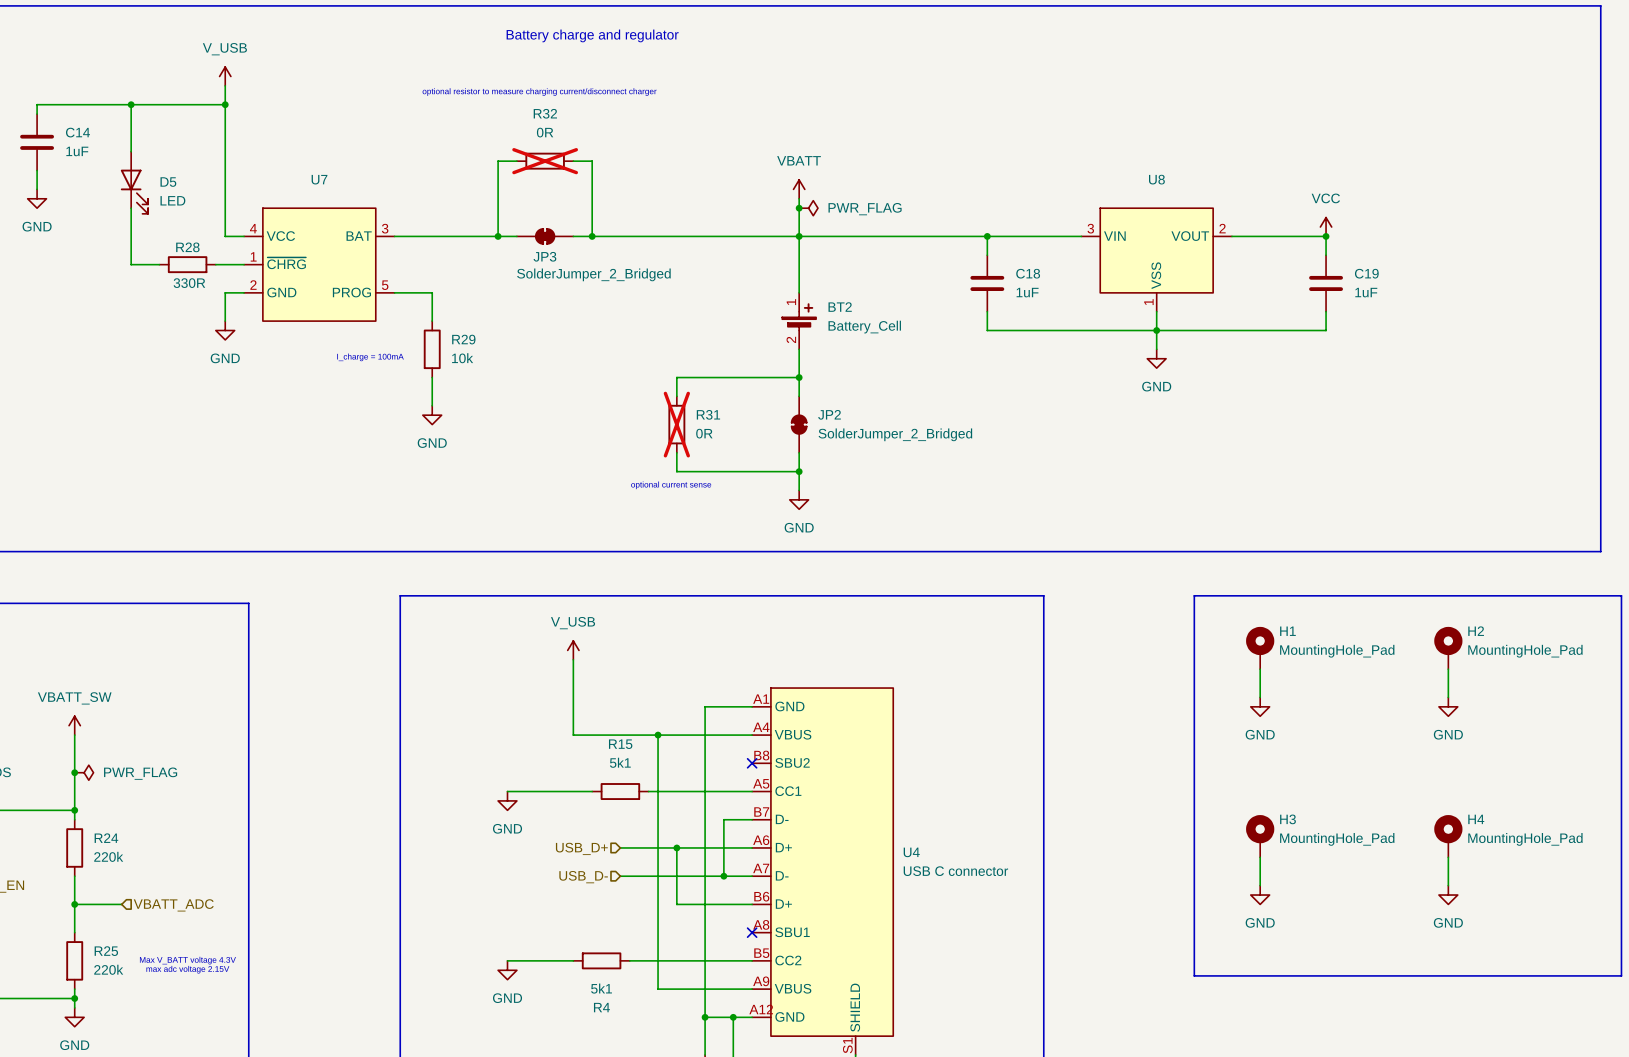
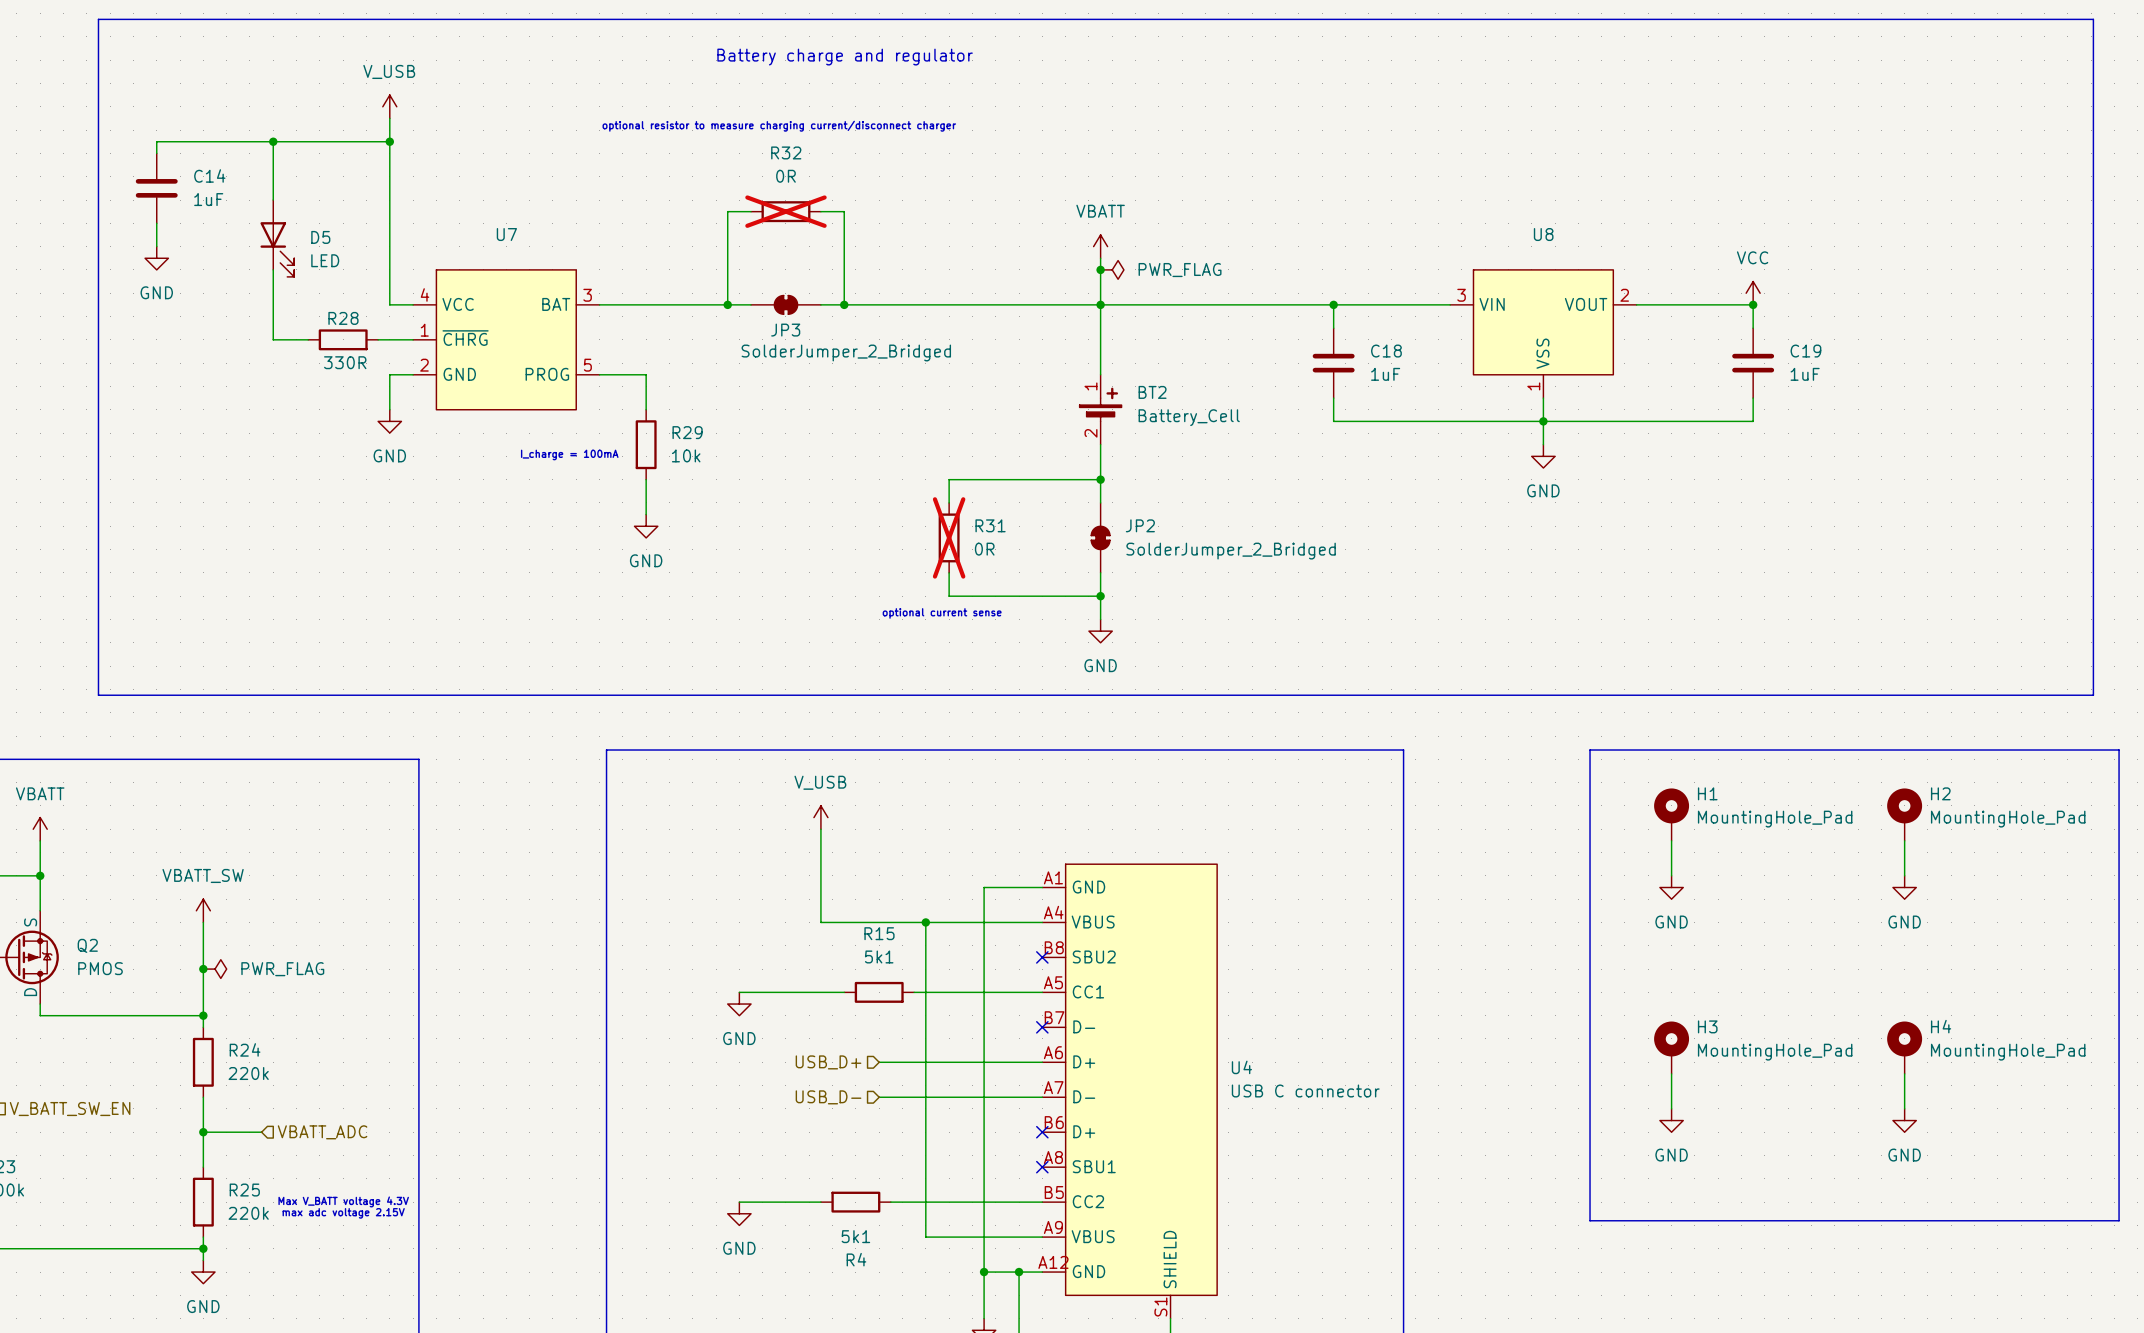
wire: (752, 819) (723, 819) (723, 876) -> none
no-connect mark: none -> (1042, 1027)
wire: (676, 847) (676, 904) (752, 904) -> none
junction: (676, 847) -> none
junction: (723, 876) -> none
no-connect mark: none -> (1042, 1132)

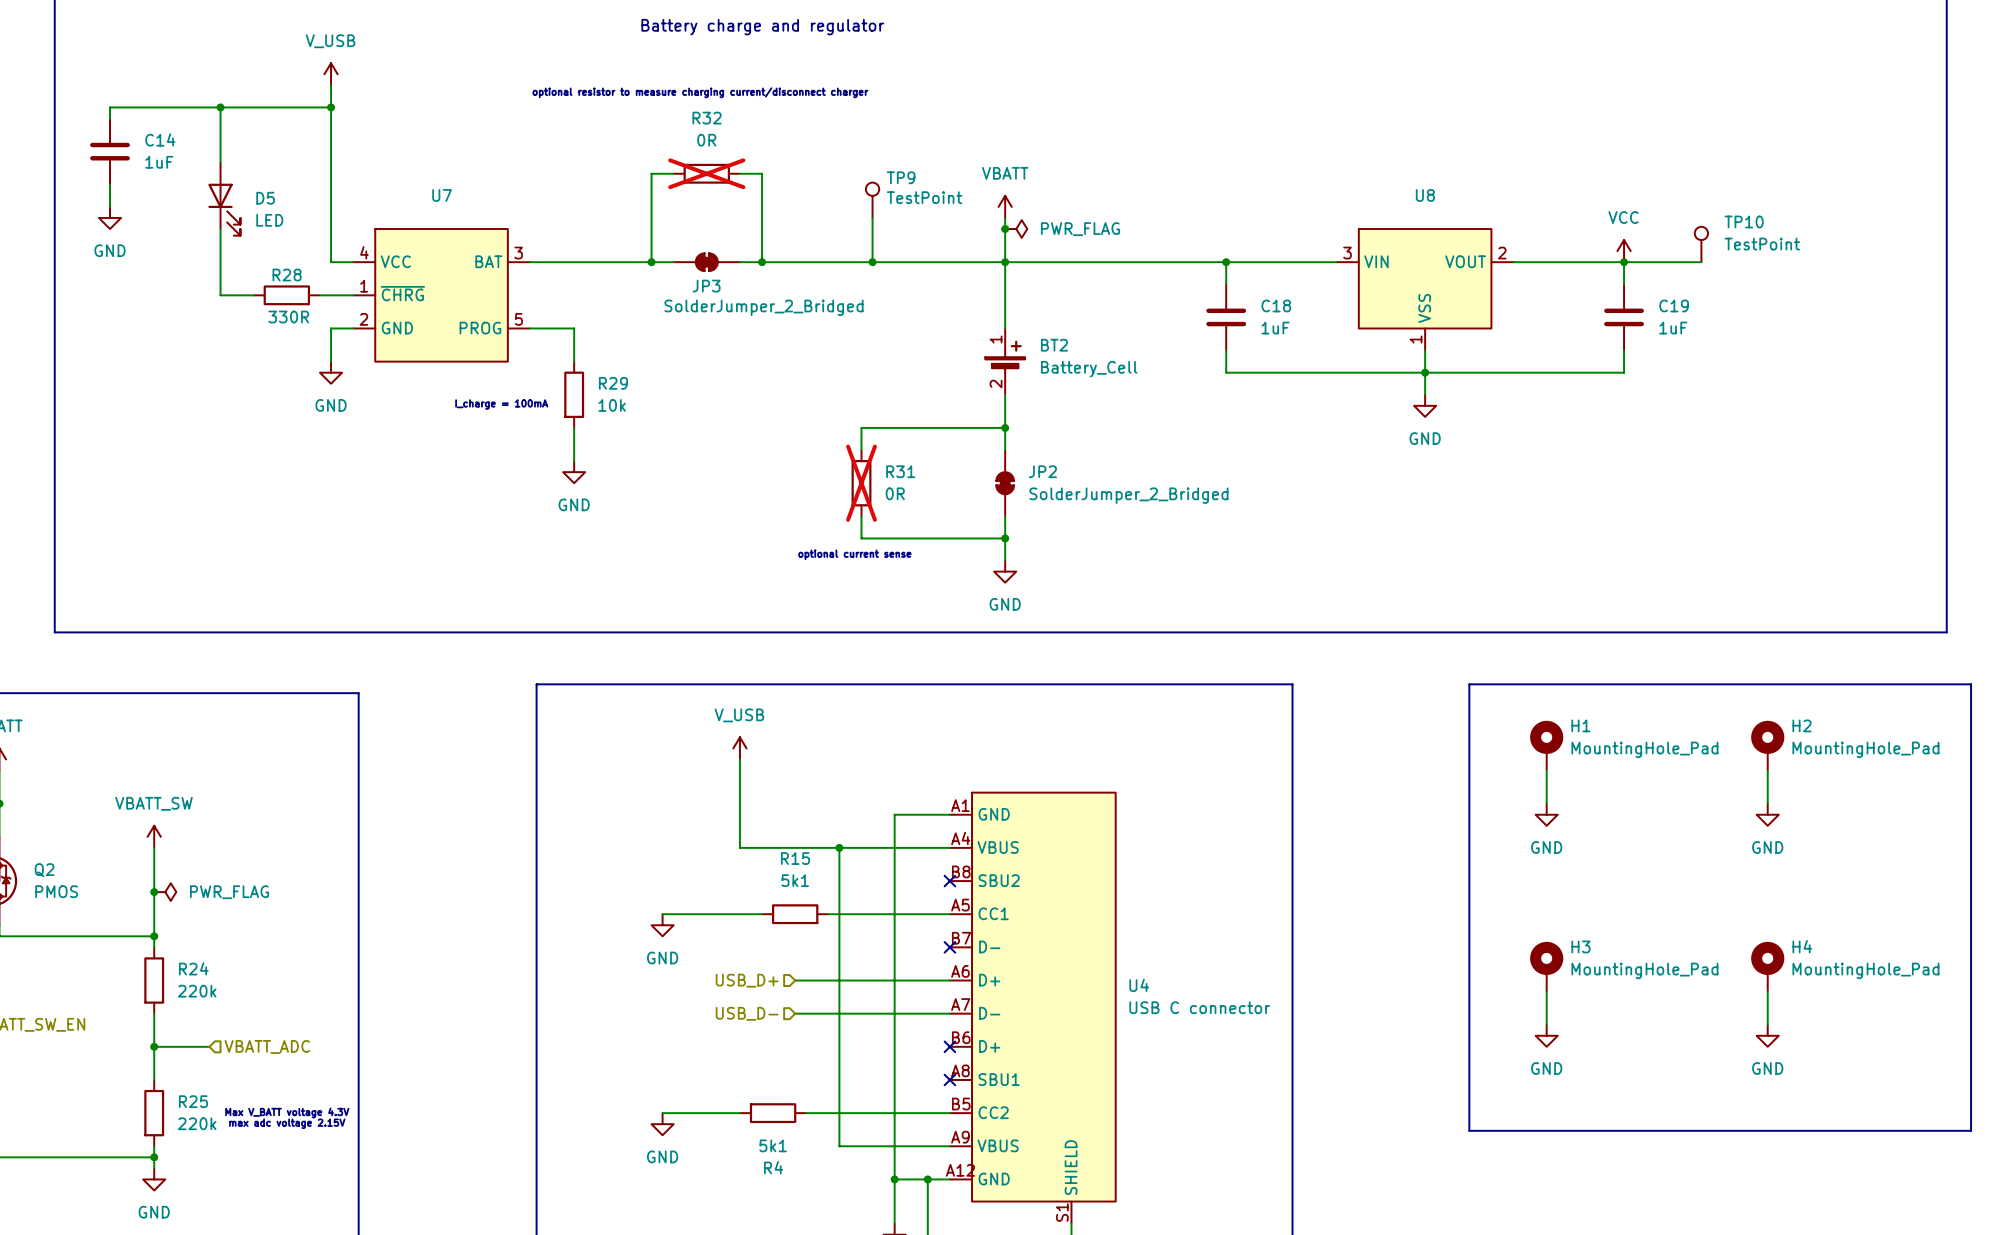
TP9: none -> TestPoint (872, 200)
wire: none -> (872, 217) (872, 262)
TP10: none -> TestPoint (1701, 244)
junction: none -> (872, 262)
wire: none -> (1624, 262) (1701, 262)

